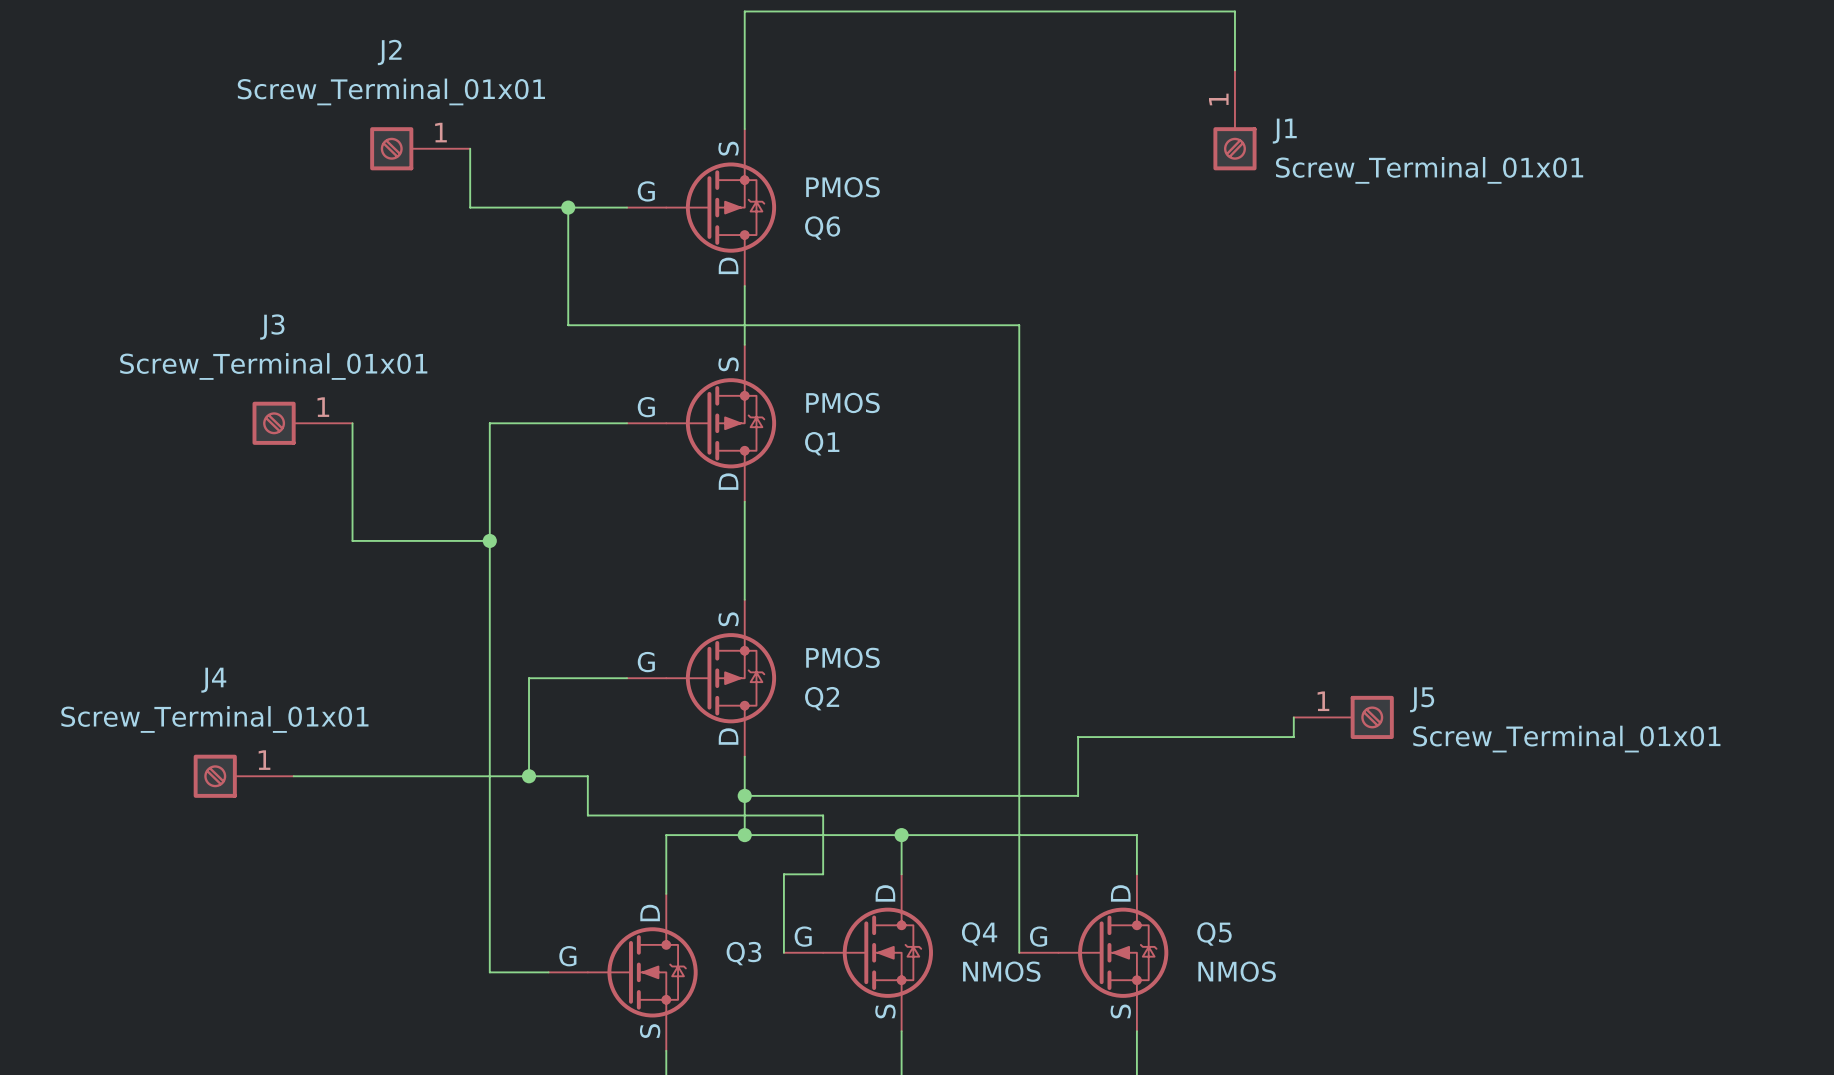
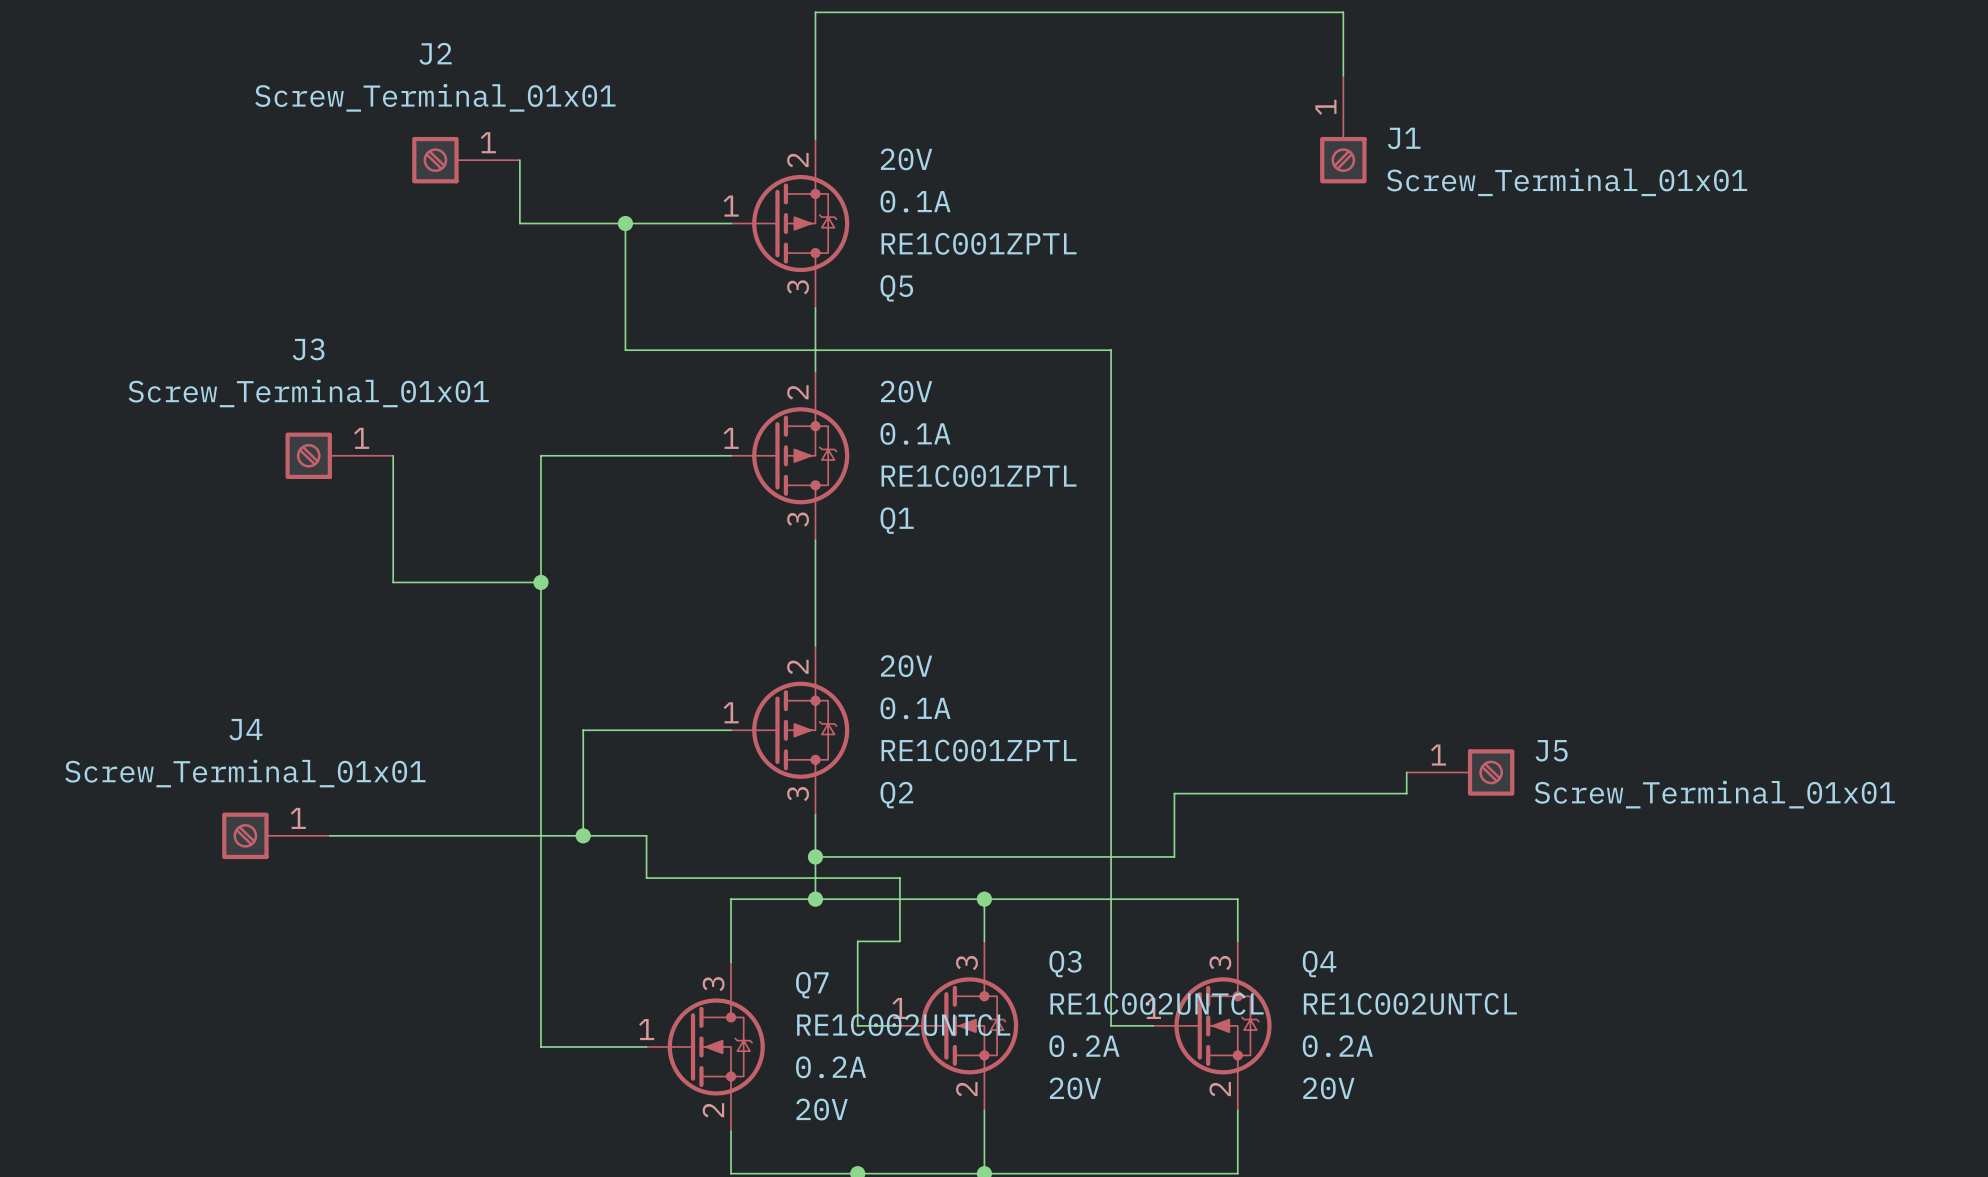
Q5 text: none -> 20V (906, 159)
Q5 text: none -> 0.1A (915, 201)
Q6: PMOS (701, 207) -> none
Q1 symbol: [627, 344, 777, 502] -> [731, 371, 850, 541]
Q1 text: none -> 20V (906, 391)
Q1 text: none -> 0.1A (915, 433)
Q1 value: PMOS (842, 402) -> RE1C001ZPTL (979, 476)
Q1 name position: Q1 (822, 443) -> Q1 (897, 520)
Q2 symbol: [627, 599, 777, 757] -> [731, 645, 850, 815]
Q2 text: none -> 20V (906, 666)
Q2 text: none -> 0.1A (915, 708)
Q2 value: PMOS (842, 657) -> RE1C001ZPTL (979, 750)
Q2 name position: Q2 (822, 698) -> Q2 (896, 795)
Q4 symbol: [783, 874, 933, 1032] -> [1153, 941, 1272, 1111]
Q5 symbol: [1019, 874, 1169, 1032] -> [731, 139, 850, 308]
Q3 symbol: [548, 893, 698, 1051] -> [899, 941, 1019, 1111]
Q3 value: none -> RE1C002UNTCL (1157, 1003)
Q4 name position: Q4 (979, 933) -> Q4 (1319, 964)
Q5 name position: Q5 (1214, 933) -> Q5 (896, 288)
Q3 name position: Q3 (743, 953) -> Q3 (1065, 964)
Q3 text: none -> 0.2A (1084, 1046)
Q4 value: NMOS (1001, 971) -> RE1C002UNTCL (1410, 1003)
Q4 text: none -> 0.2A (1337, 1046)
Q5 value: NMOS (1237, 971) -> RE1C001ZPTL (979, 243)
Q7: none -> RE1C002UNTCL (705, 1046)
Q3 text: none -> 20V (1075, 1088)
Q4 text: none -> 20V (1328, 1088)

